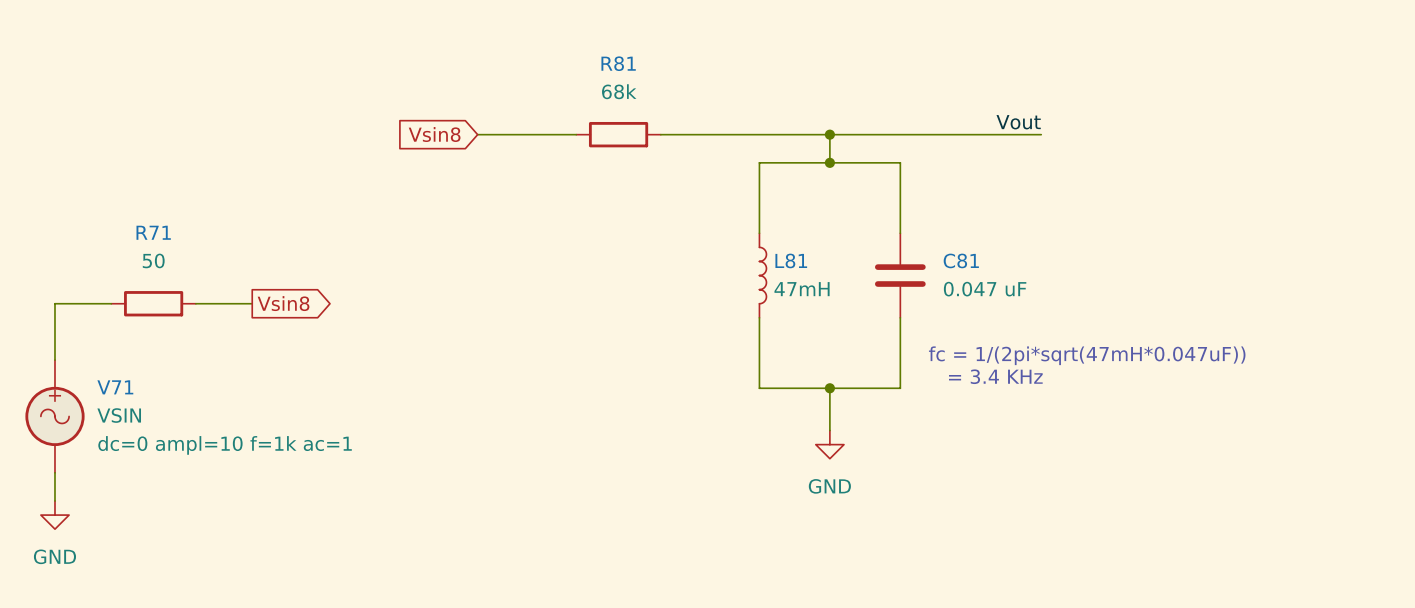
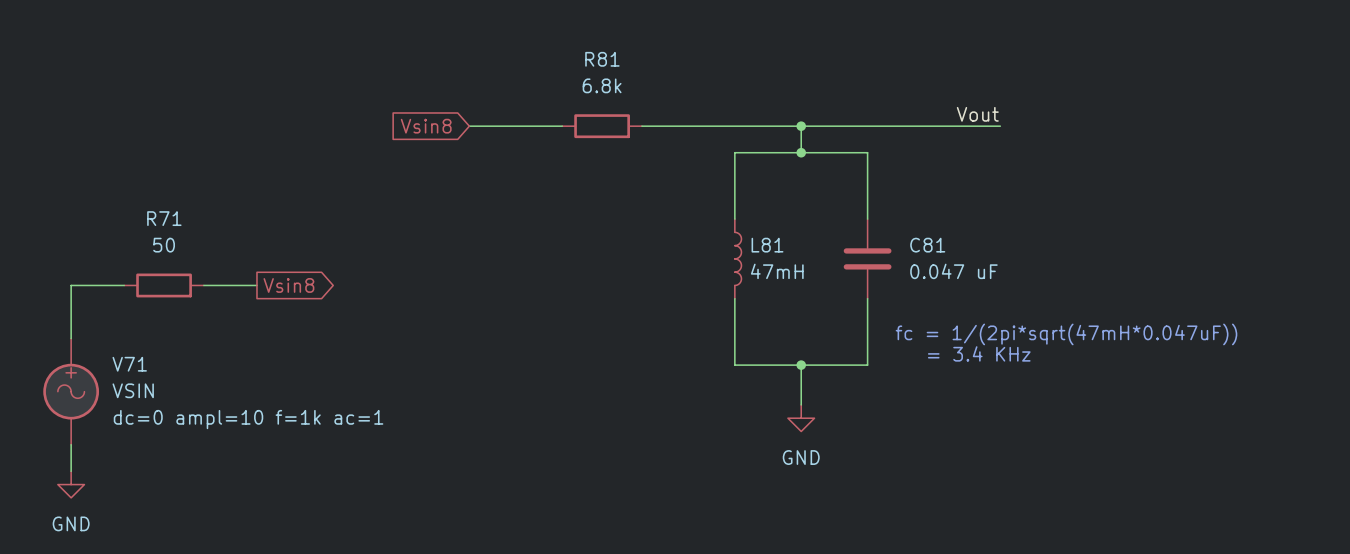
R81 value: 68k (619, 91) -> 6.8k (602, 85)

